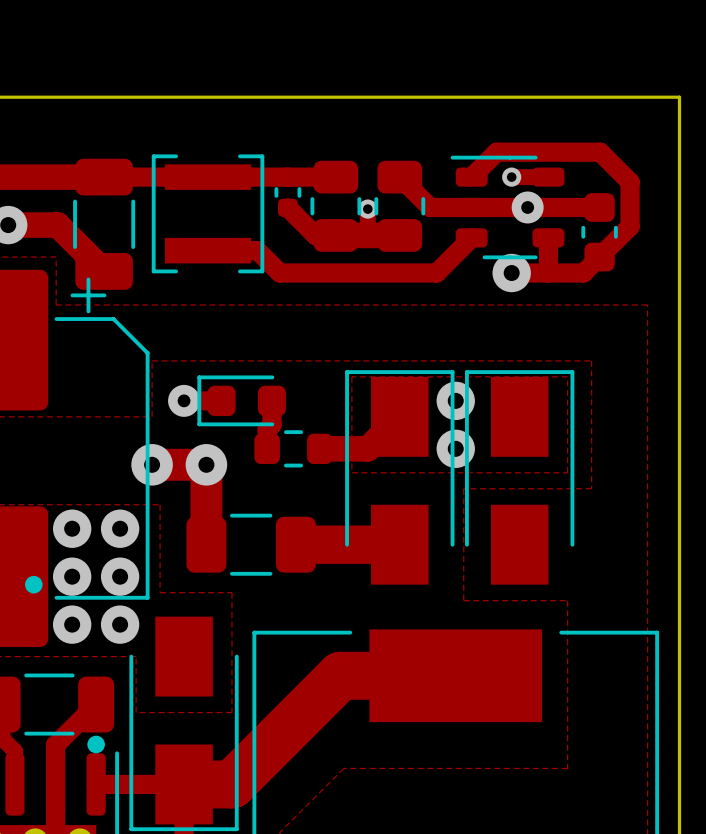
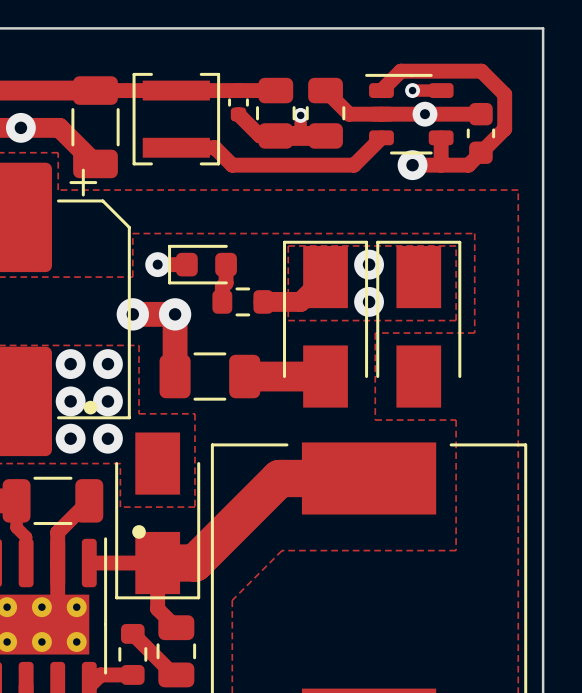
drawing position: (33, 584) -> (90, 407)
drawing position: (96, 744) -> (139, 531)

